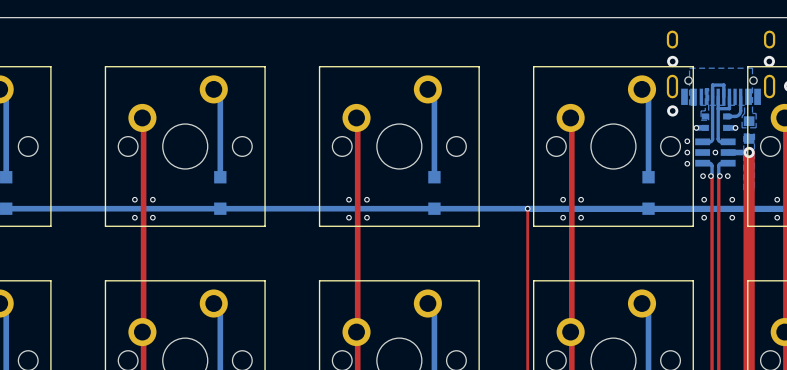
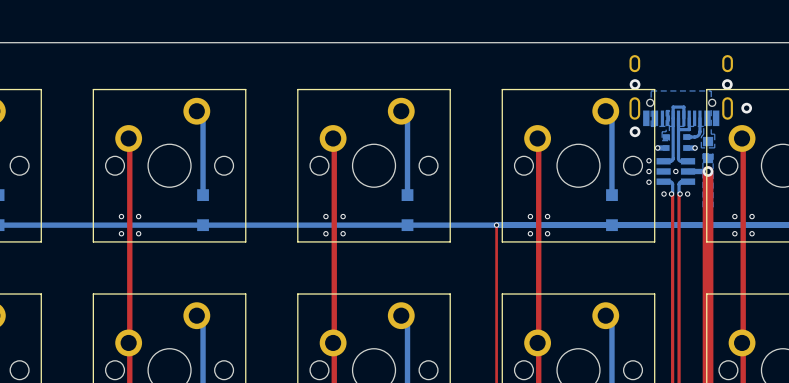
via: (704, 199) -> none
via: (732, 199) -> none
via: (704, 217) -> none
via: (732, 217) -> none

